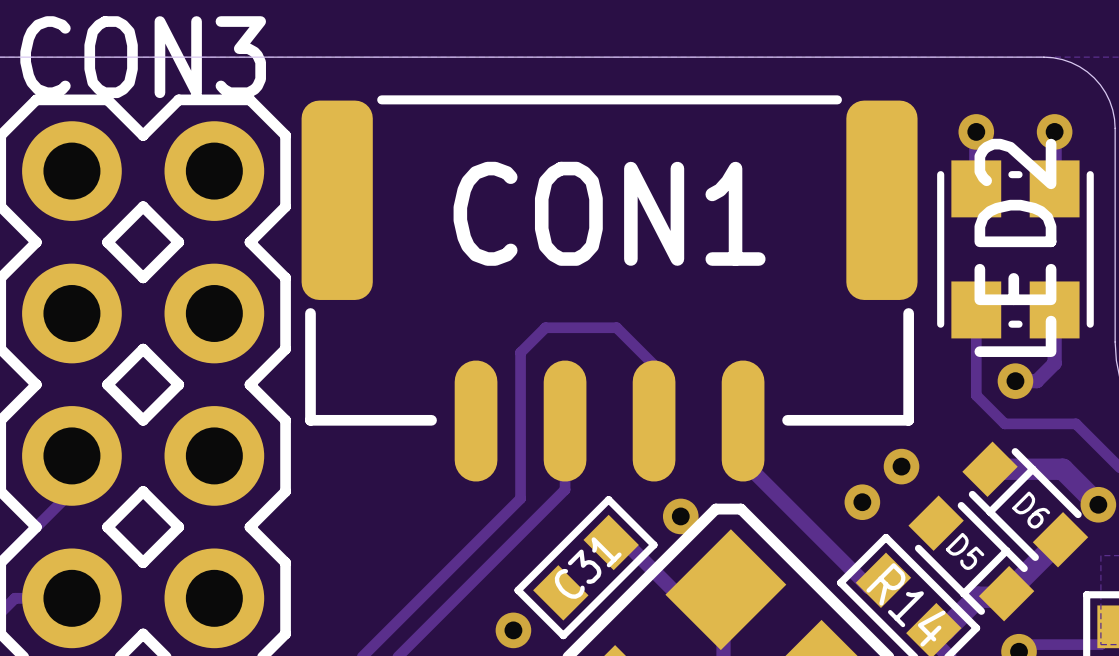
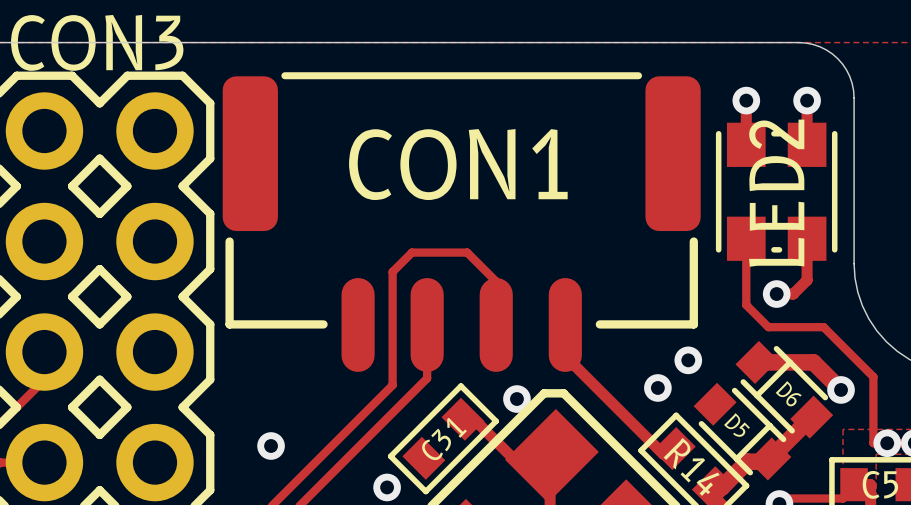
via: none -> (271, 446)

